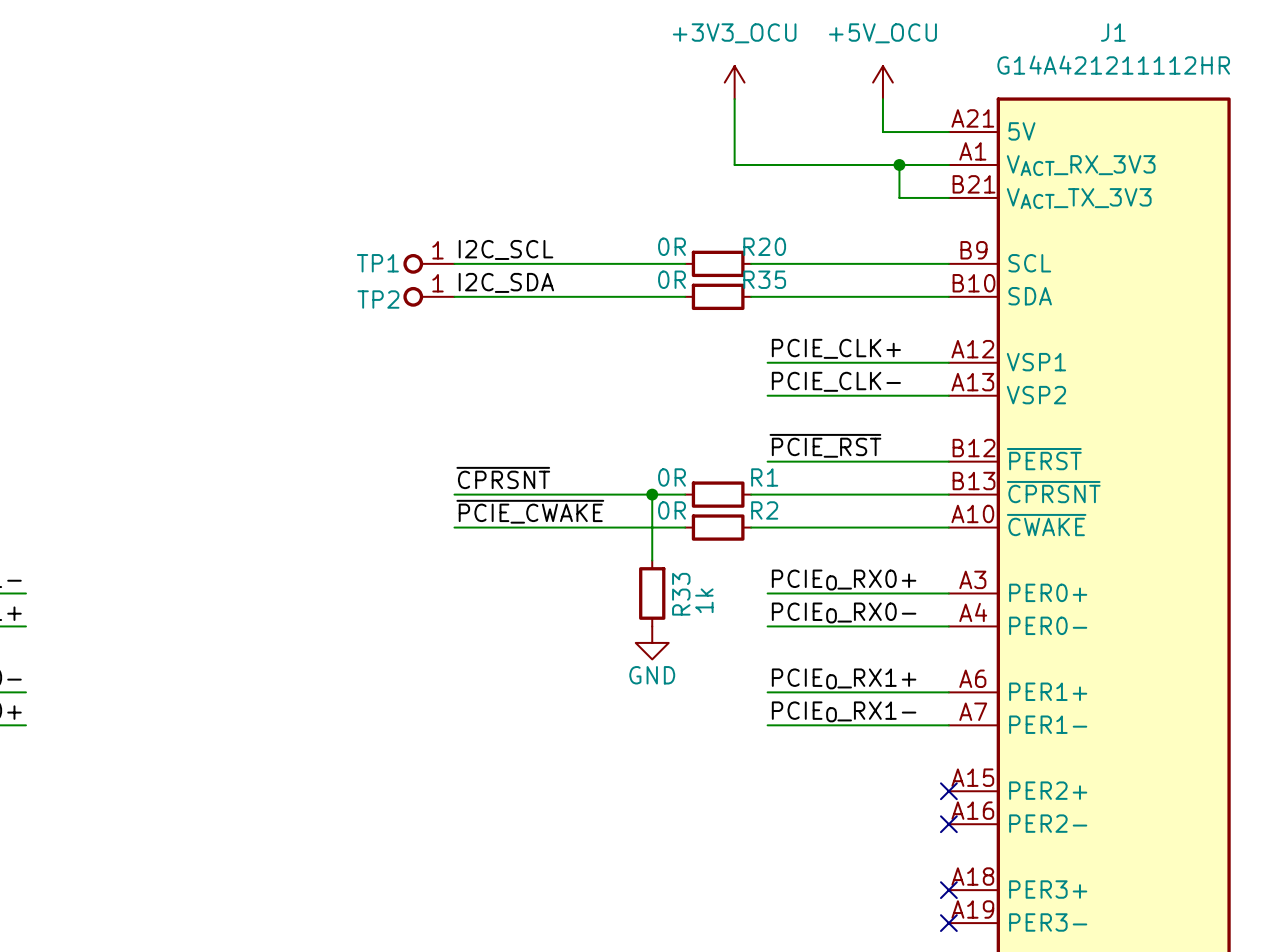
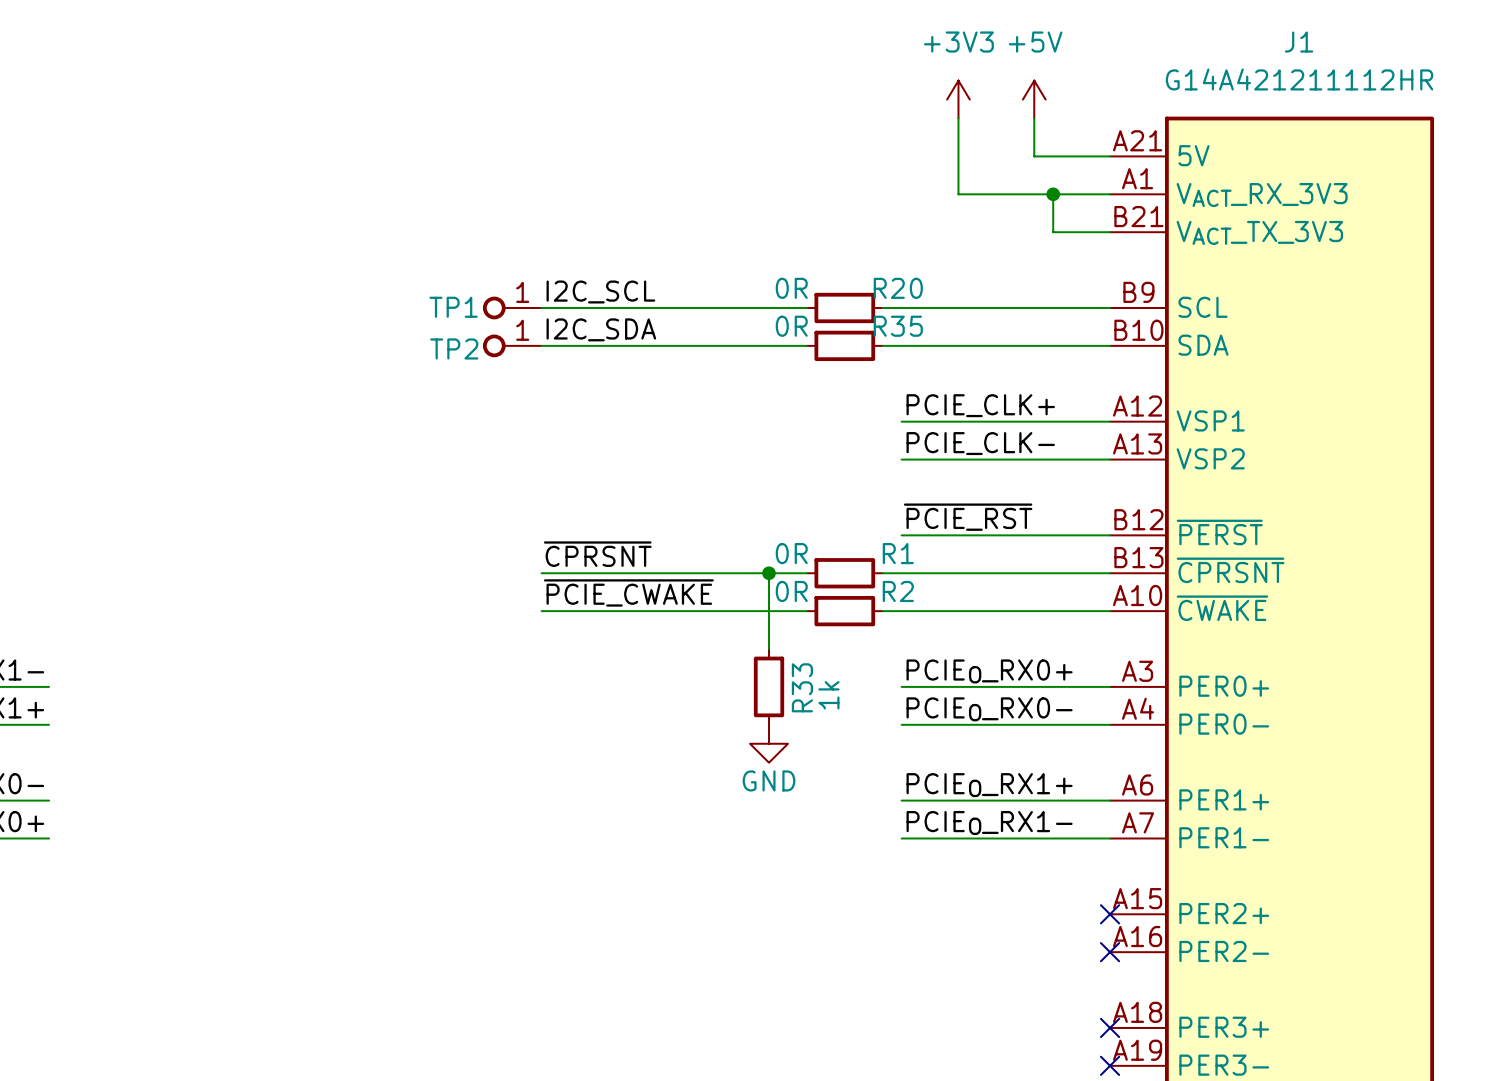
power symbol: +3V3_OCU (734, 82) -> none
power symbol: none -> +3V3 (958, 99)
power symbol: +5V_OCU (882, 82) -> +5V (1034, 99)
wire: (734, 99) (734, 164) (817, 164) -> (958, 118) (958, 194)

